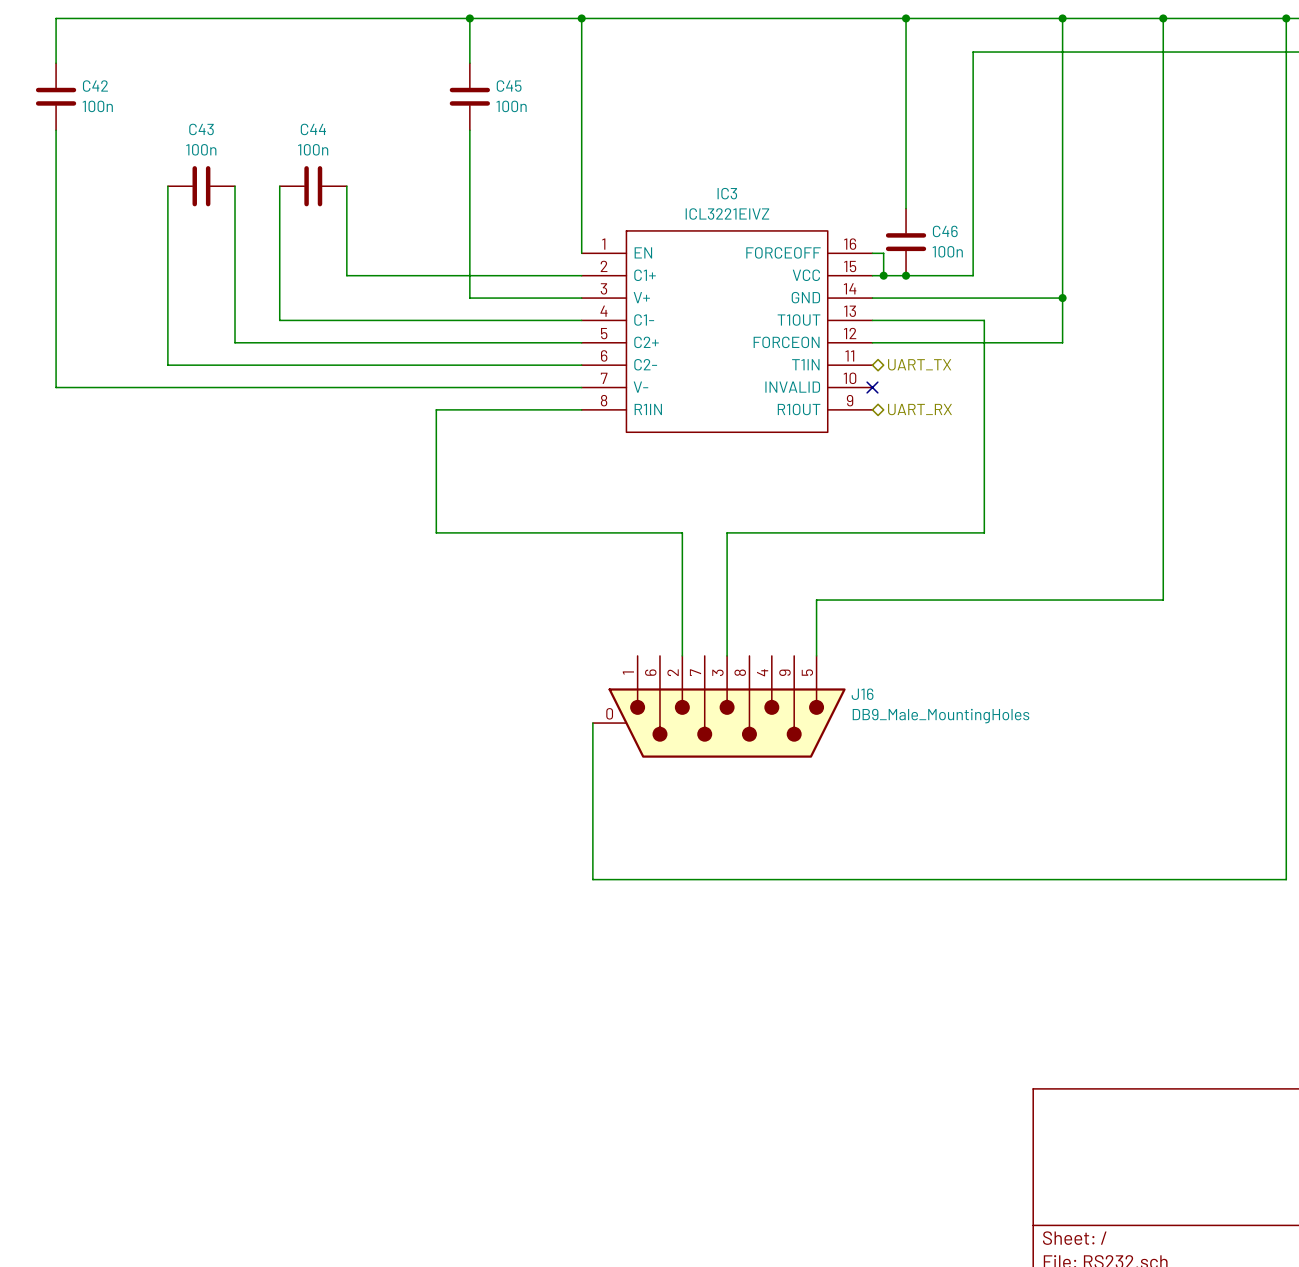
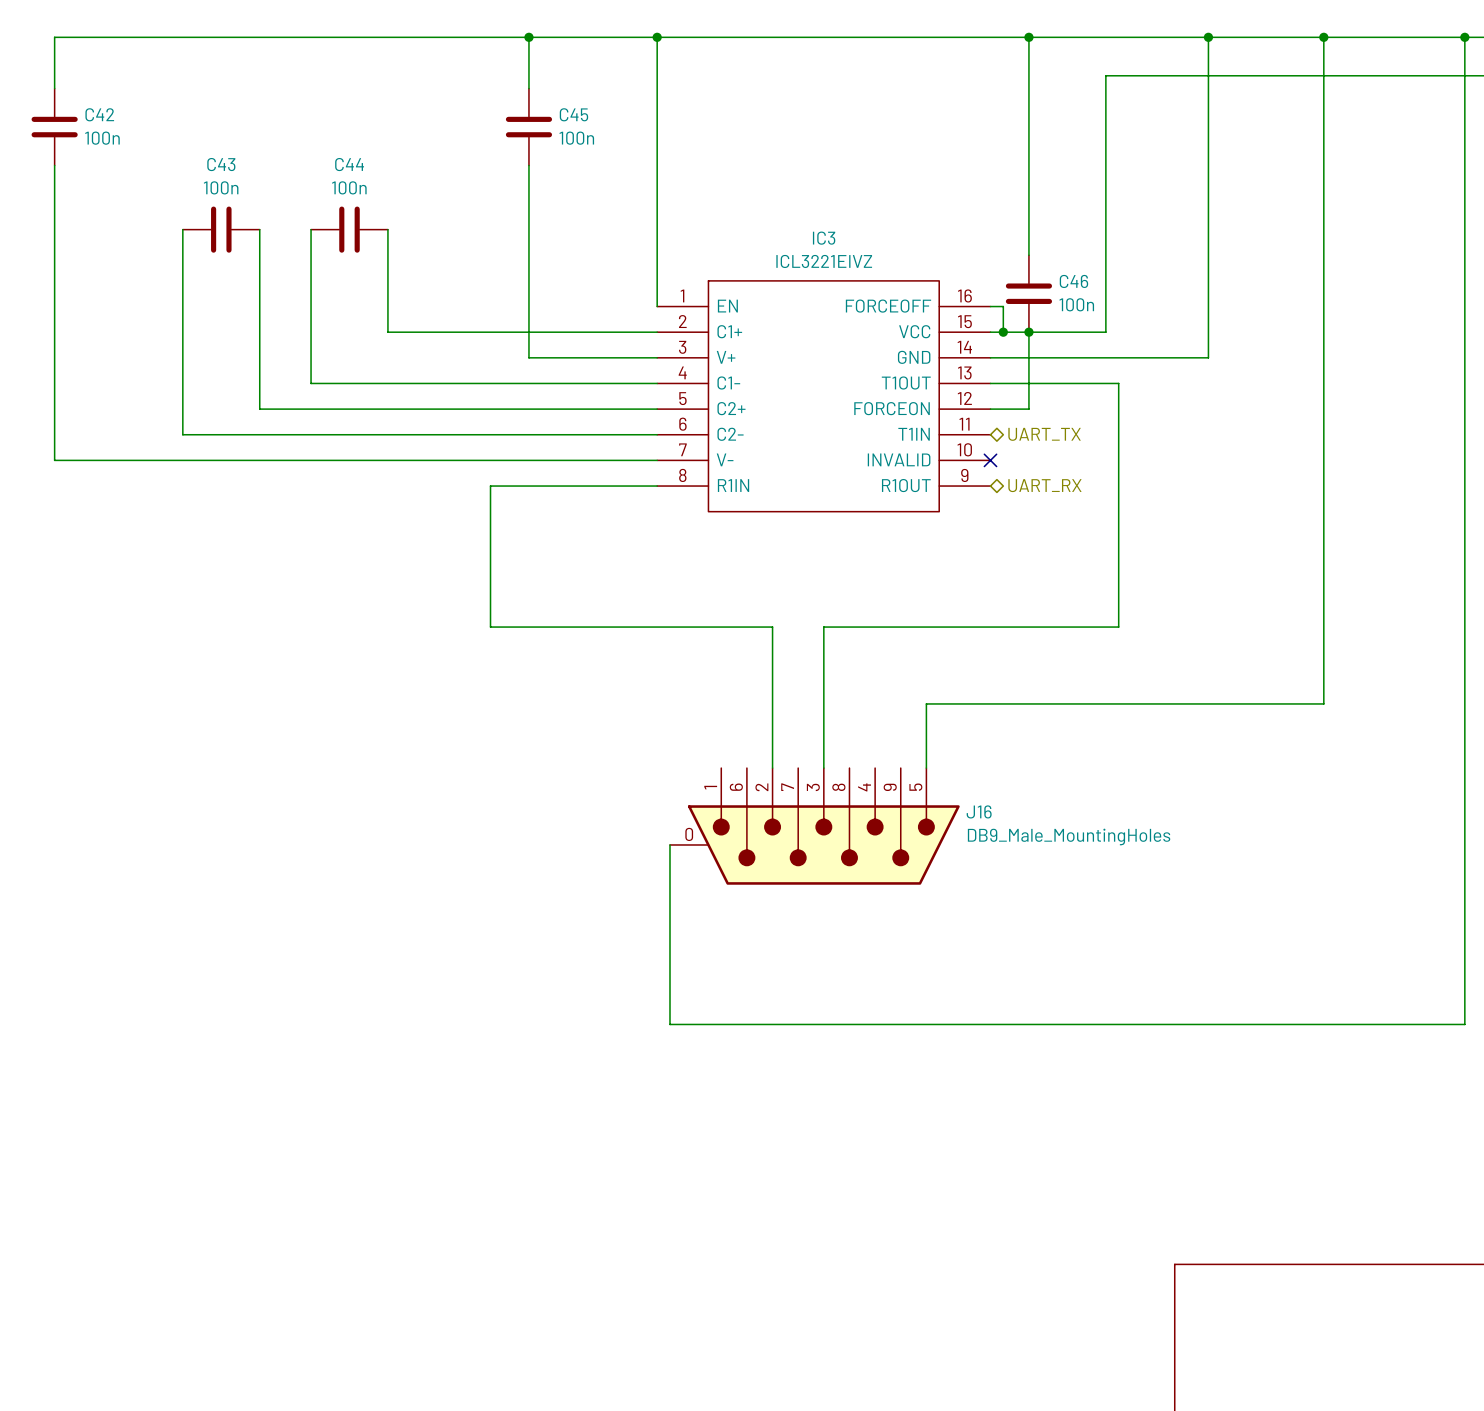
wire: (1062, 298) (1062, 342) (906, 342) -> (1028, 332) (1028, 409)
junction: (1062, 298) -> none

